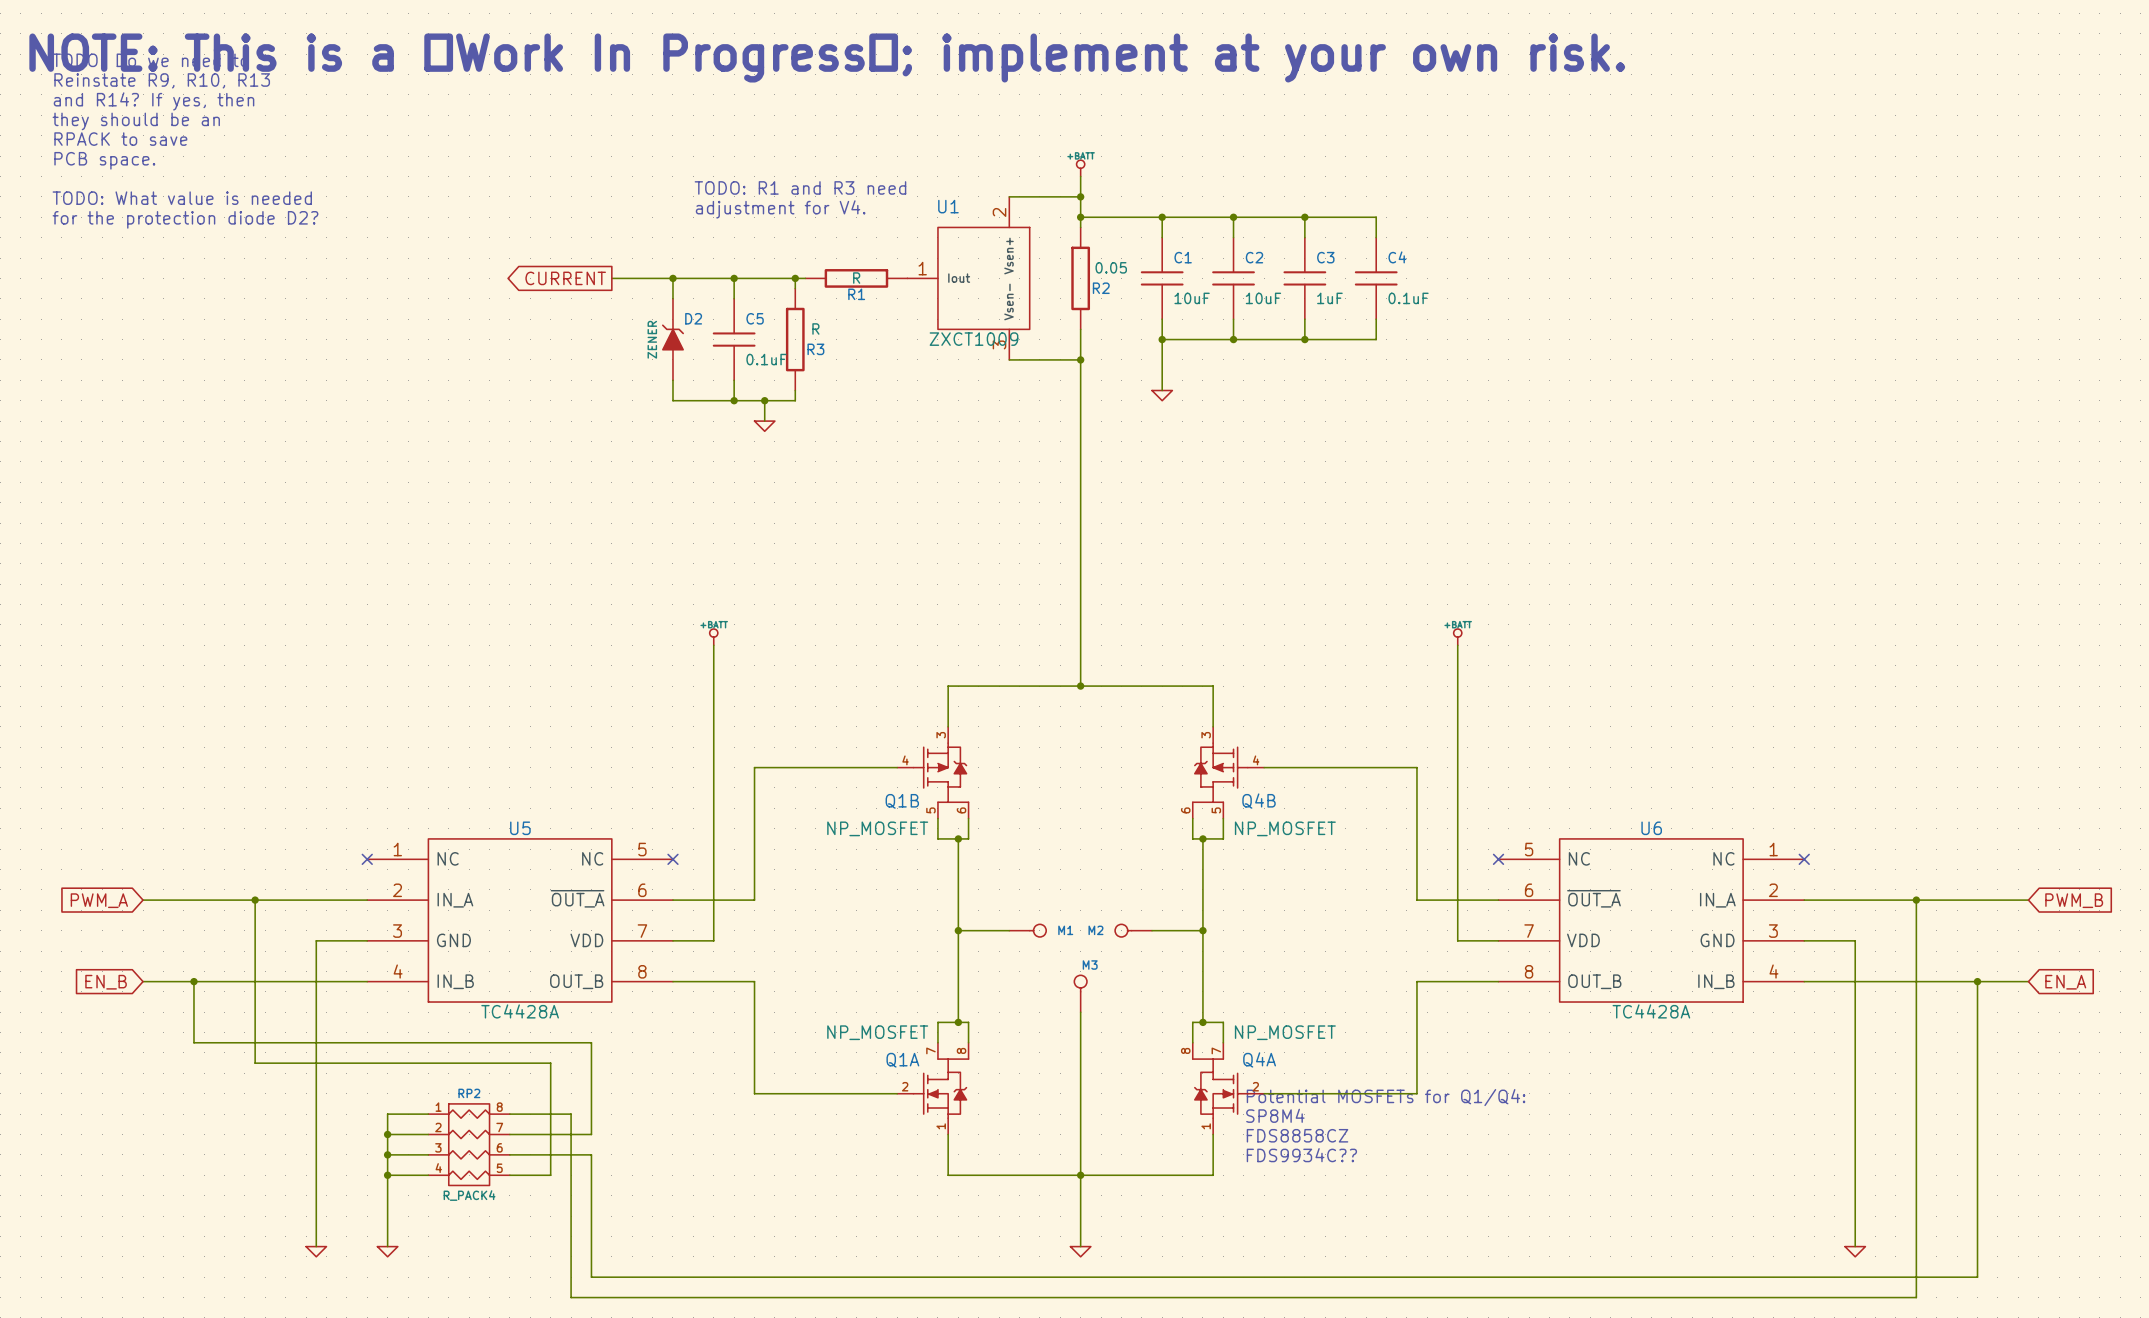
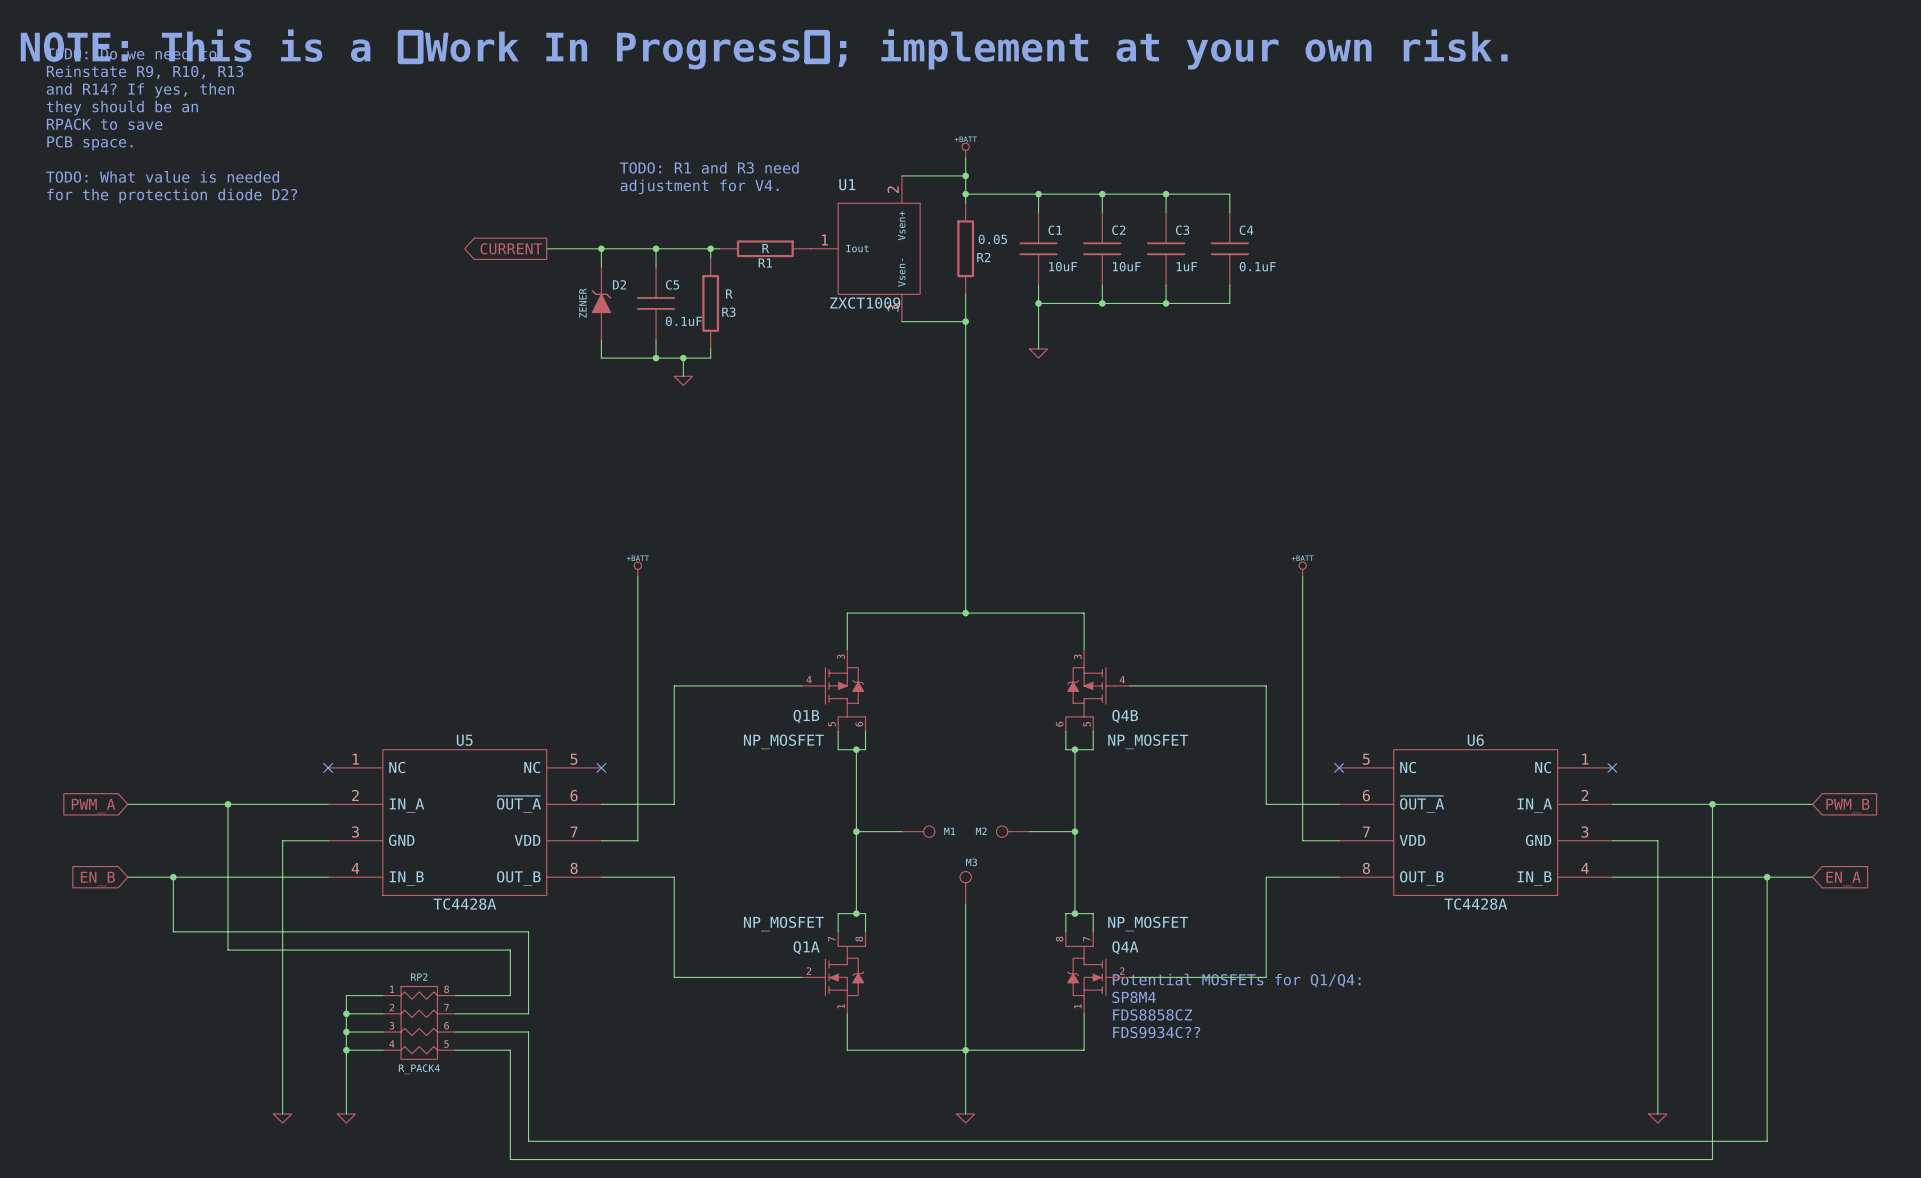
wire: (550, 1063) (550, 1175) -> (492, 950) (510, 950) (510, 995)
wire: (571, 1114) (571, 1175) -> (492, 1050) (510, 1050)

